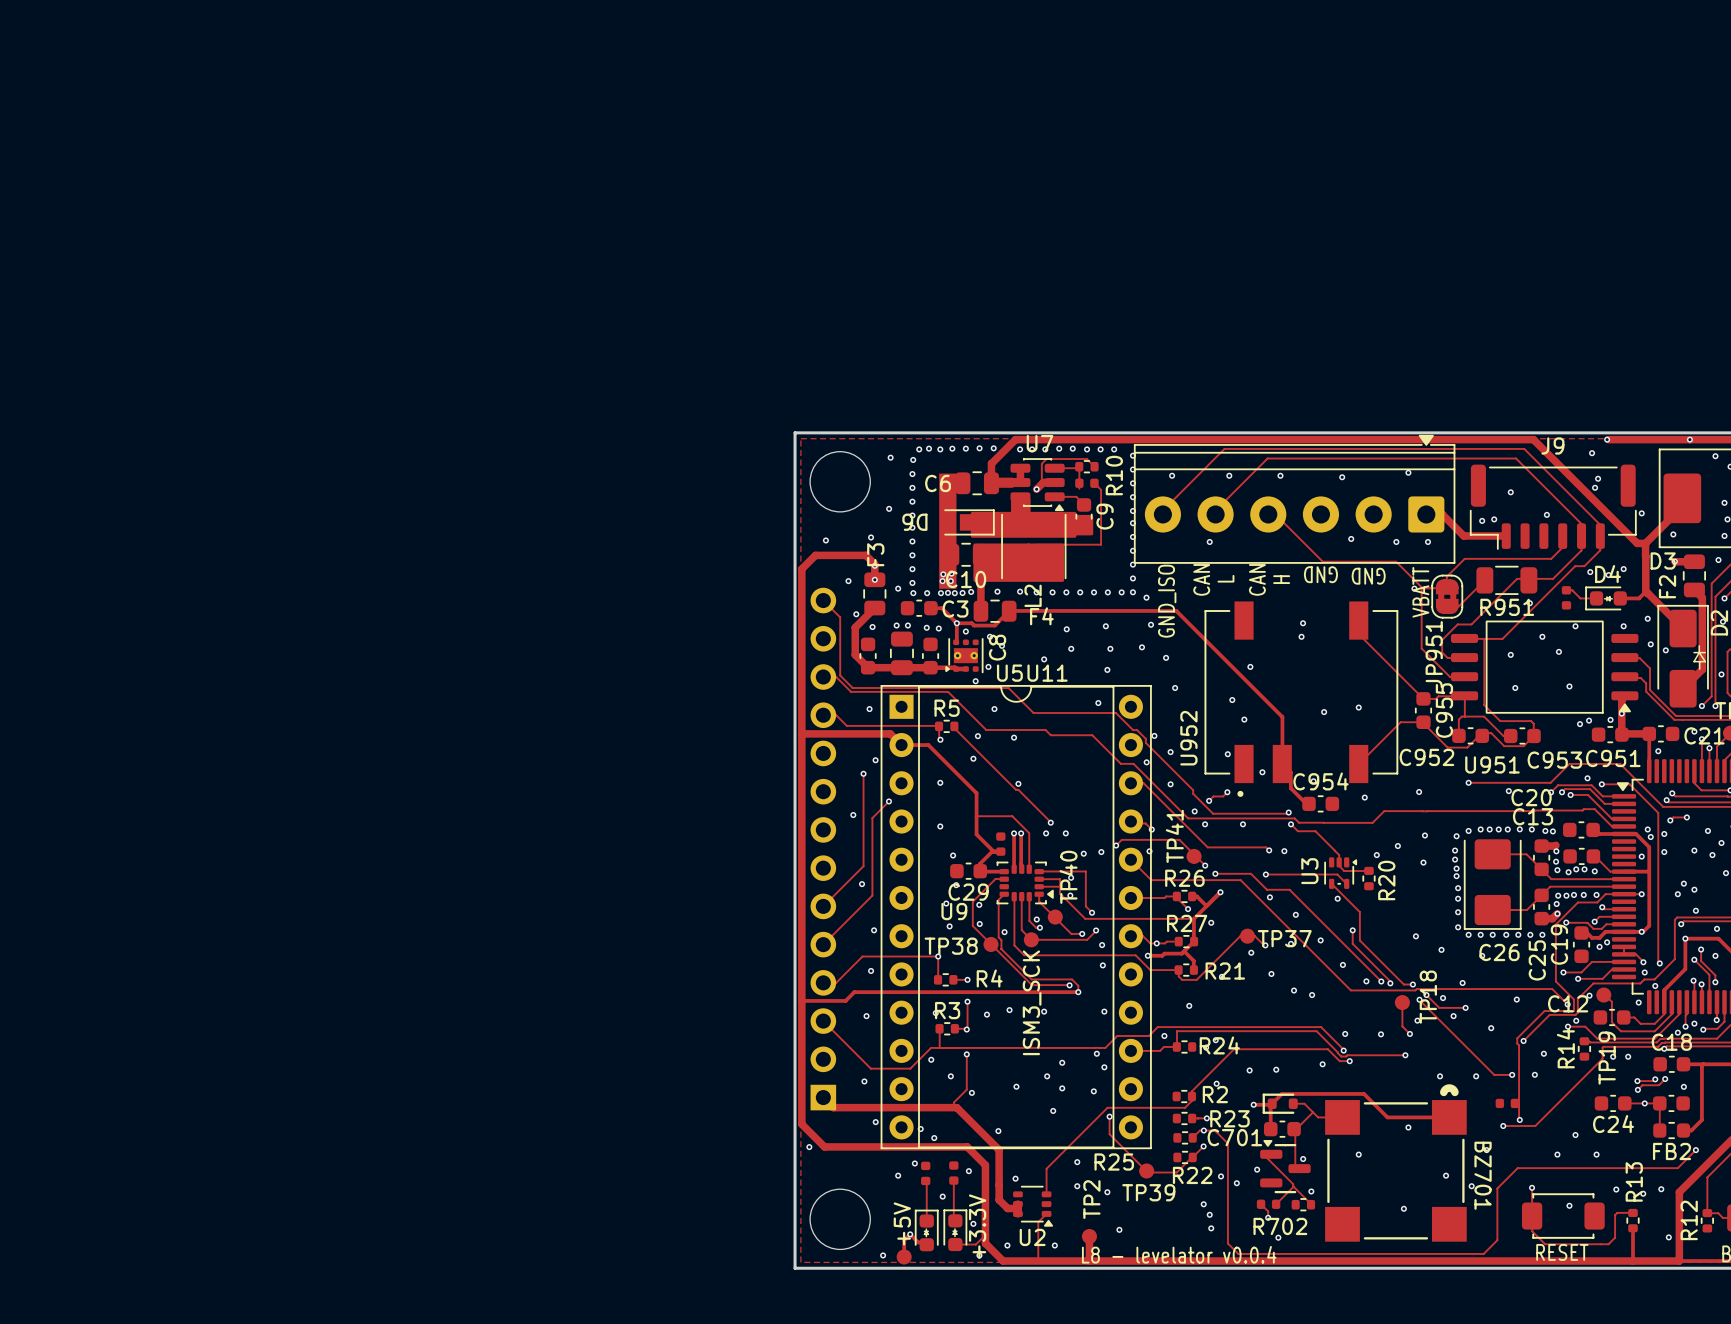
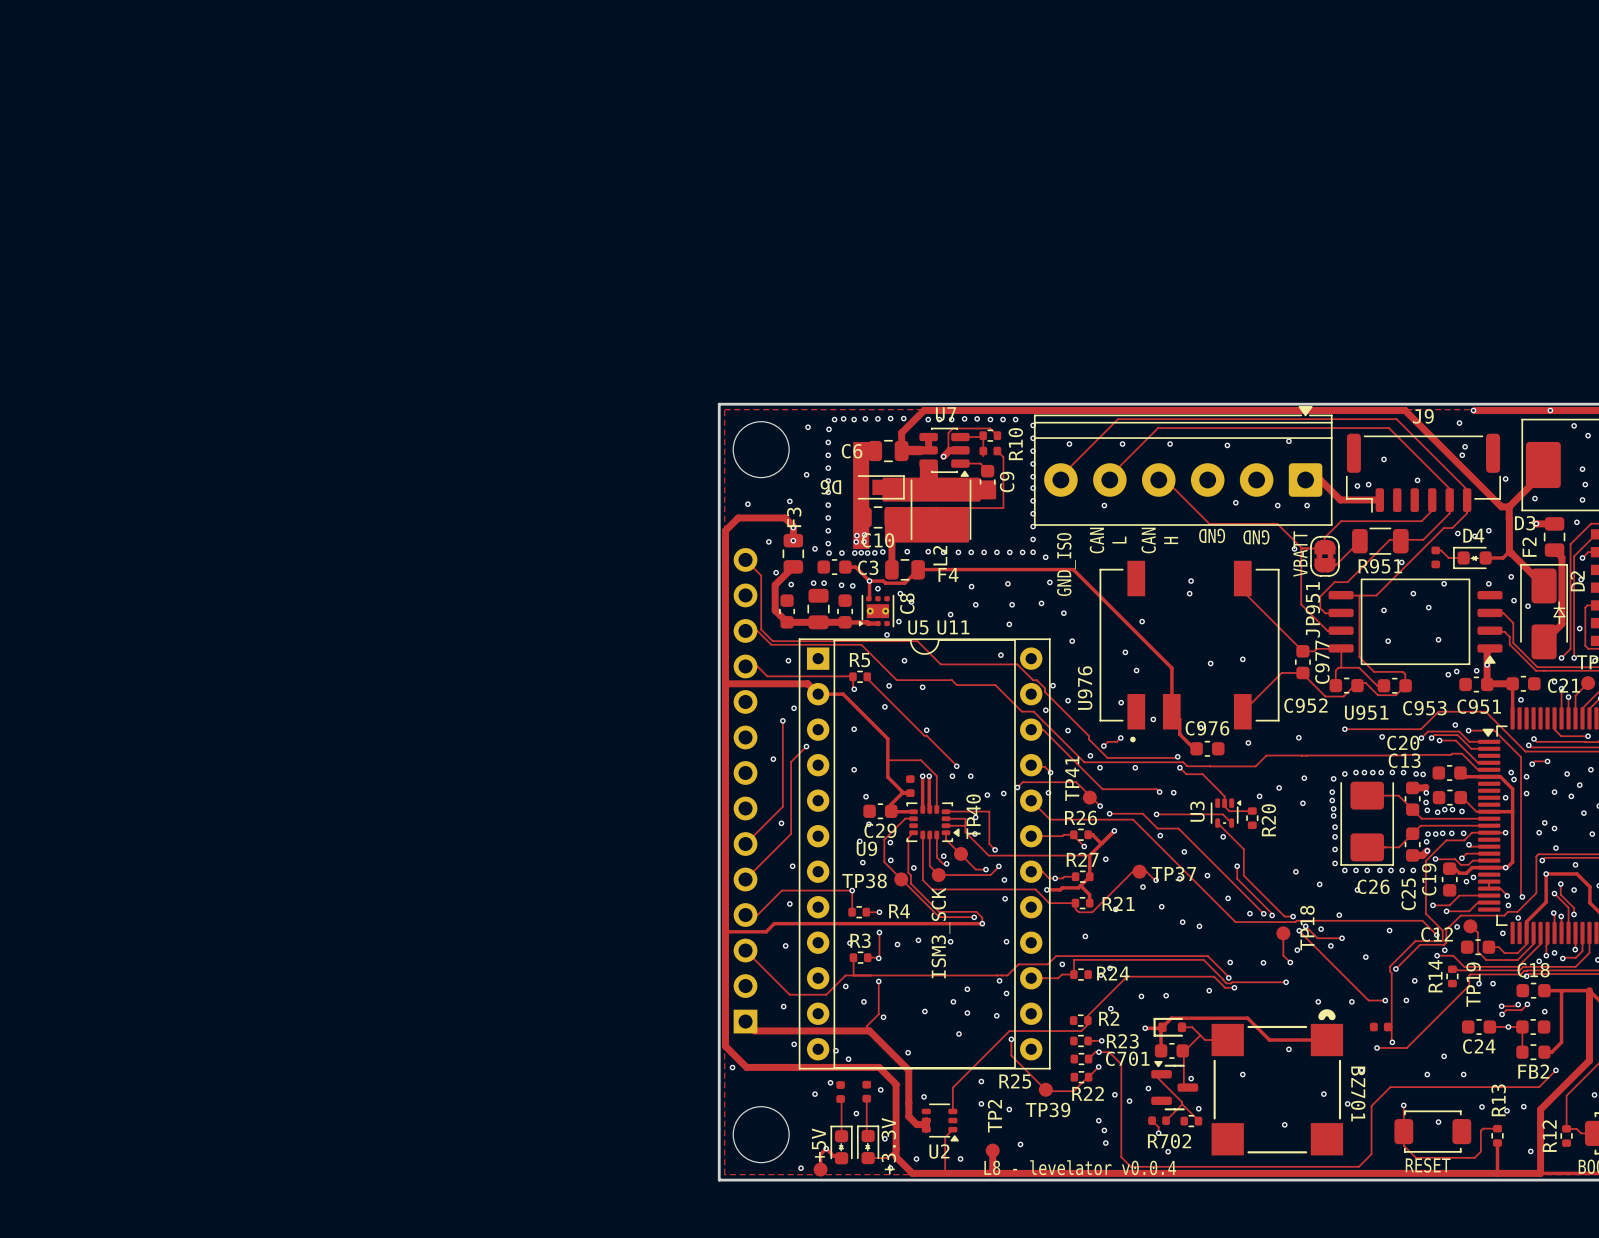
C955 name: C955 (1444, 710) -> C977 (1322, 662)
U952 name: U952 (1188, 738) -> U976 (1085, 688)
C954 name: C954 (1321, 781) -> C976 (1207, 728)

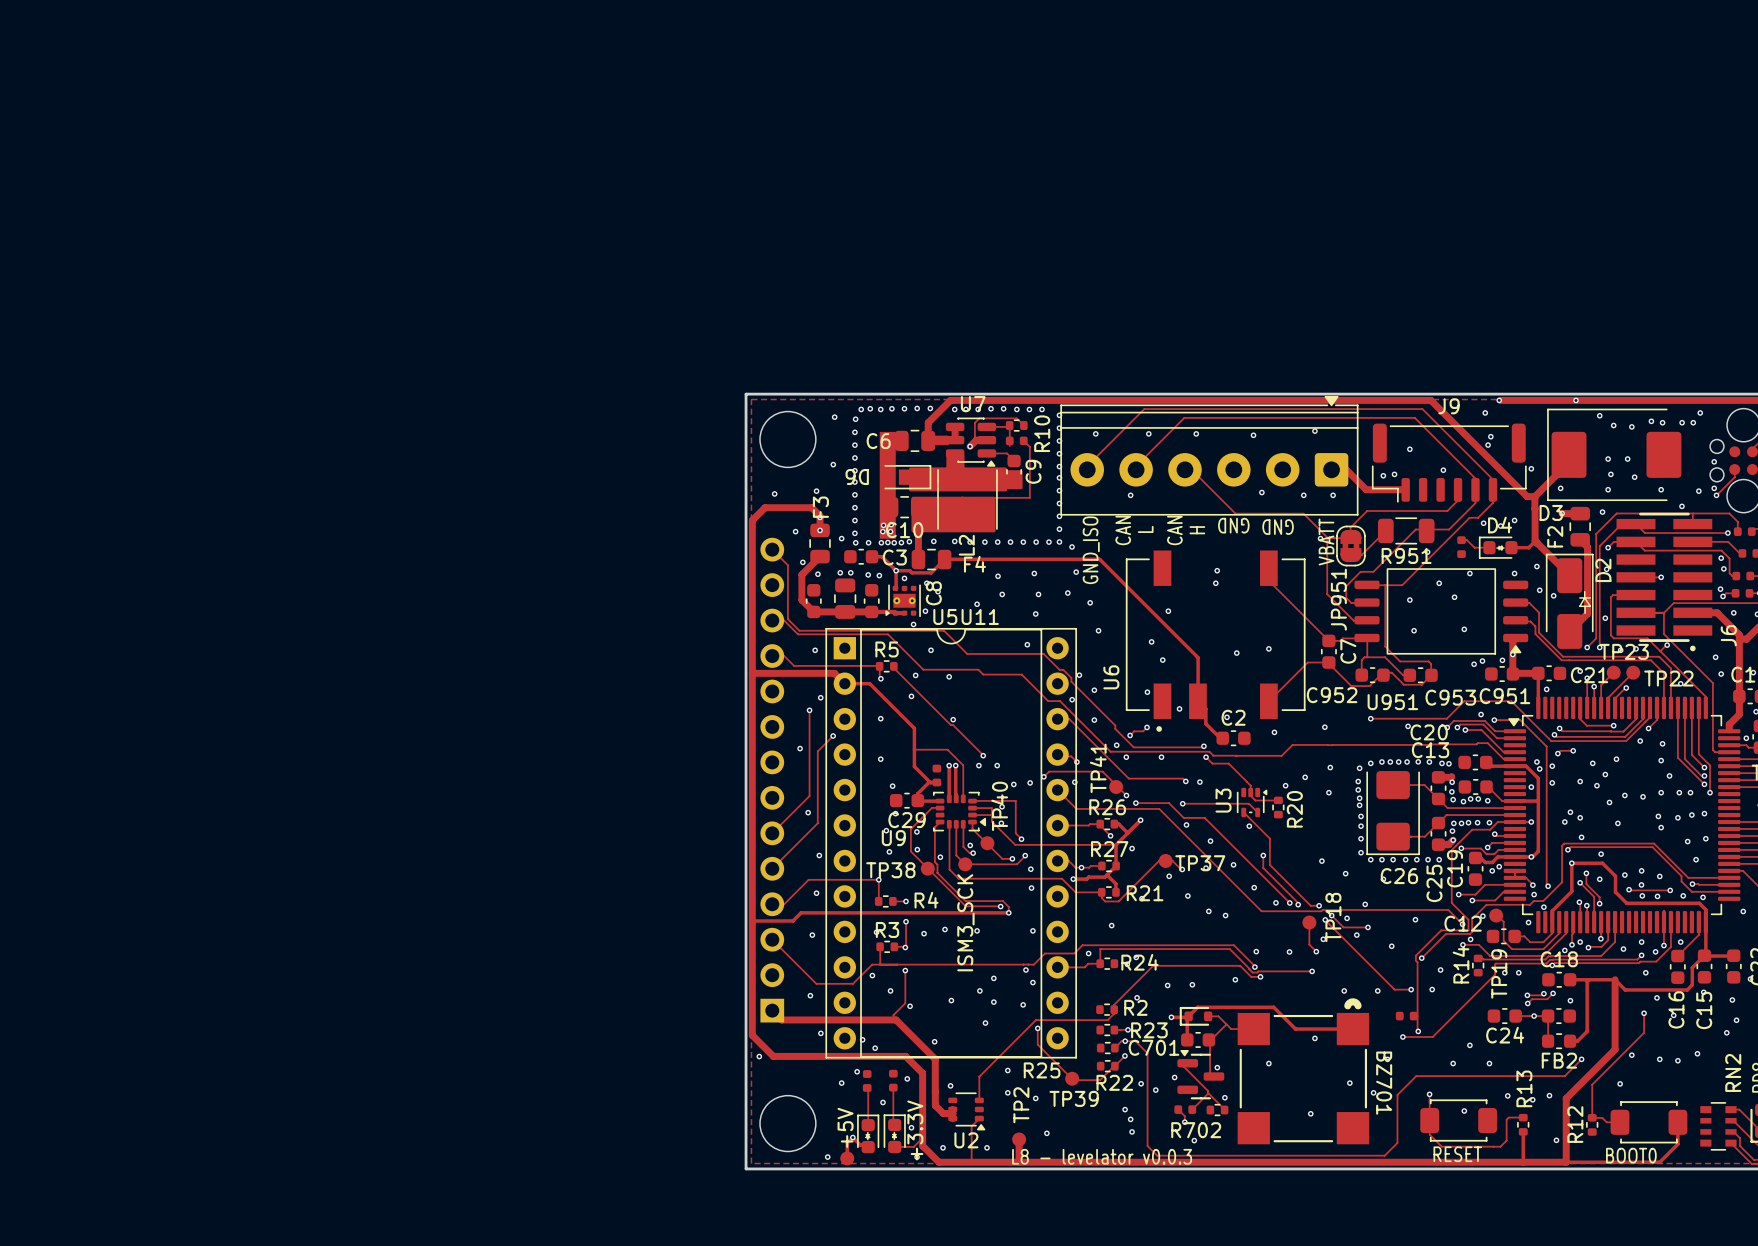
C977 name: C977 (1322, 662) -> C7 (1348, 651)
U976 name: U976 (1085, 688) -> U6 (1111, 677)
C976 name: C976 (1207, 728) -> C2 (1233, 717)
text: L8 - levelator v0.0.4 (1080, 1167) -> L8 - levelator v0.0.3 (1102, 1156)

